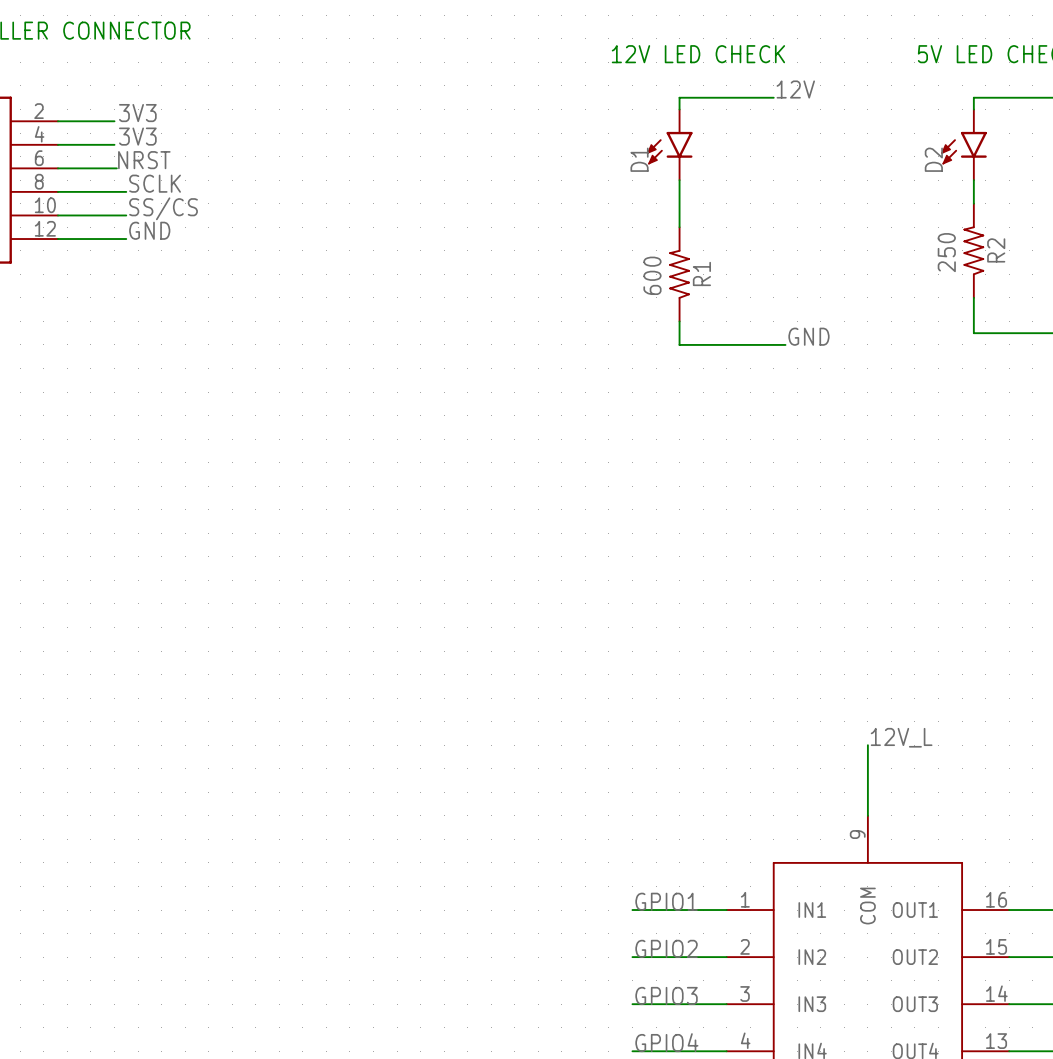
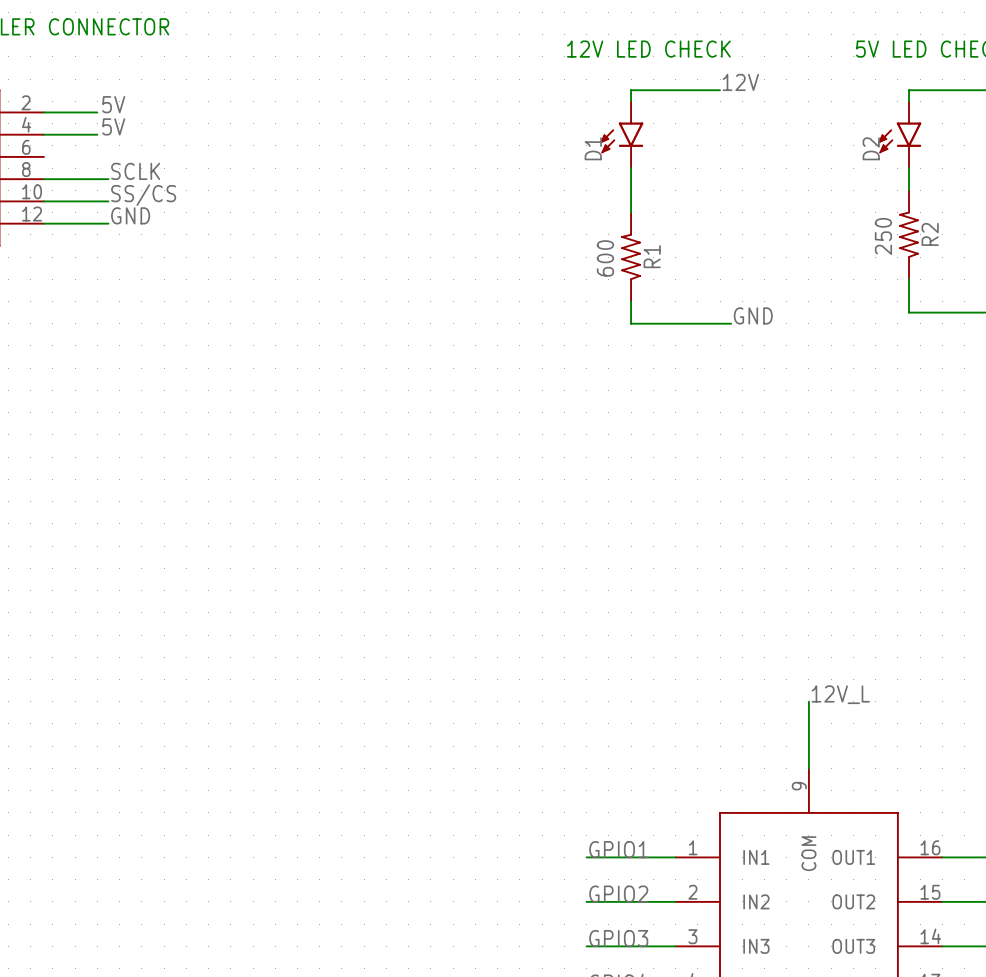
label: 3V3 (137, 113) -> 5V (113, 104)
label: 3V3 (137, 136) -> 5V (113, 126)
label: NRST (144, 160) -> none
wire: (57, 168) (116, 168) -> none

